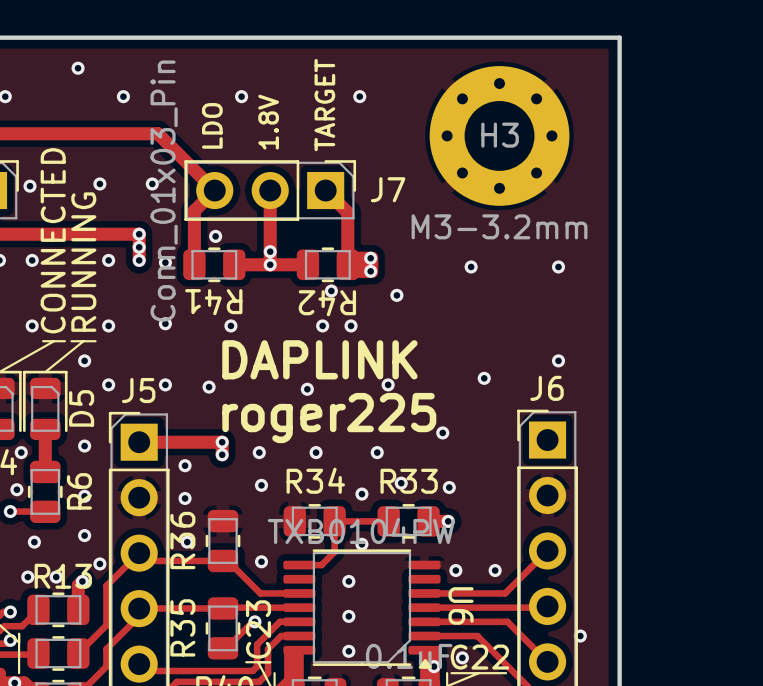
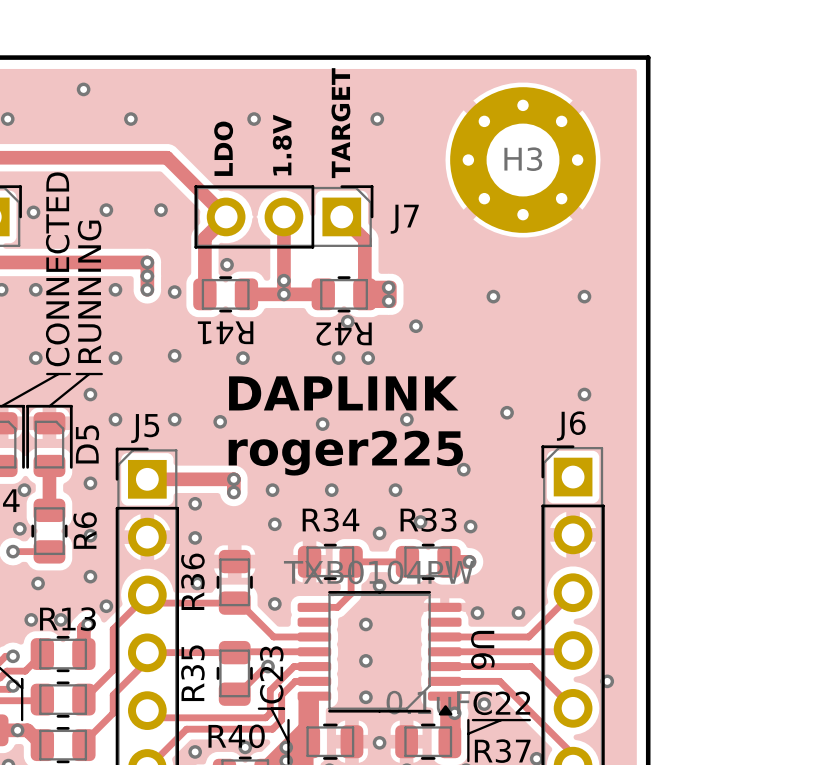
J7 value: Conn_01x03_Pin (164, 191) -> none
H3 value: M3-3.2mm (499, 226) -> none

